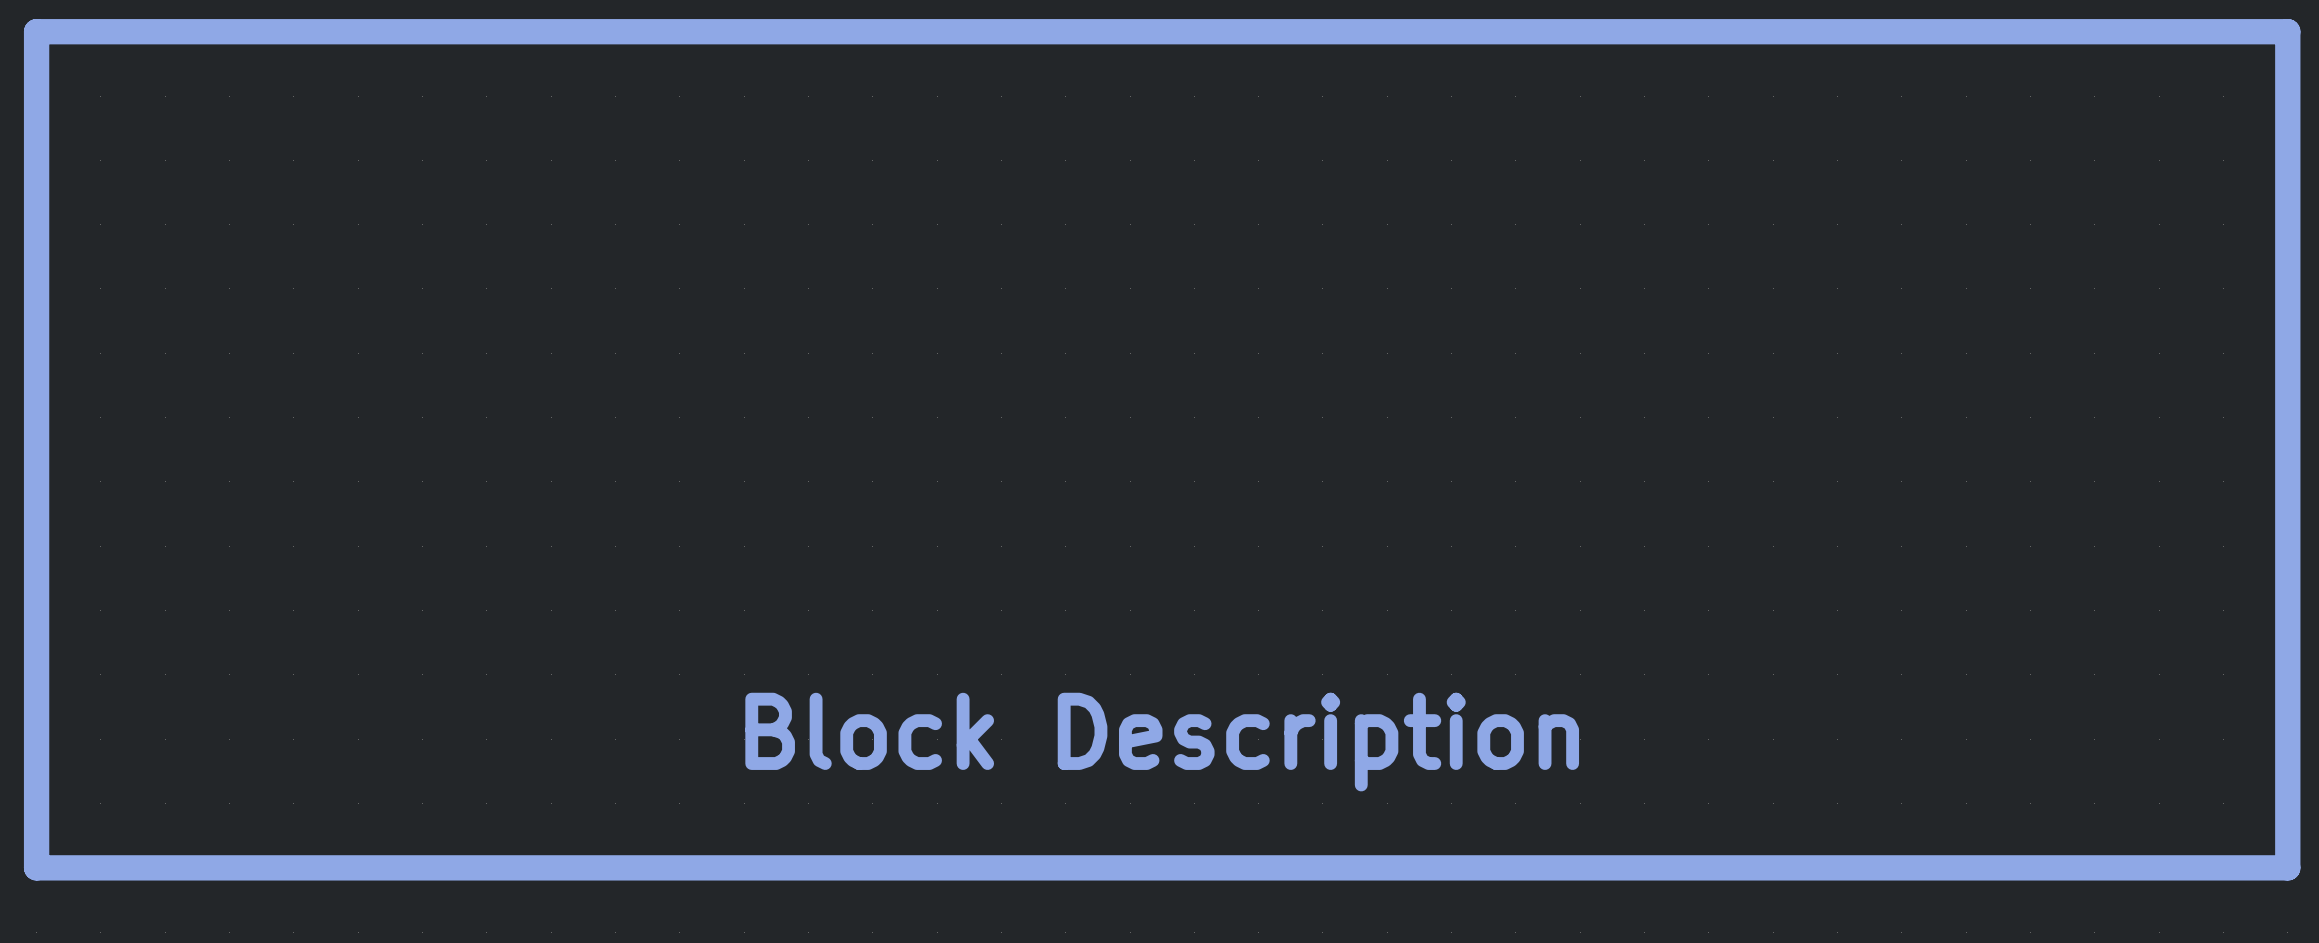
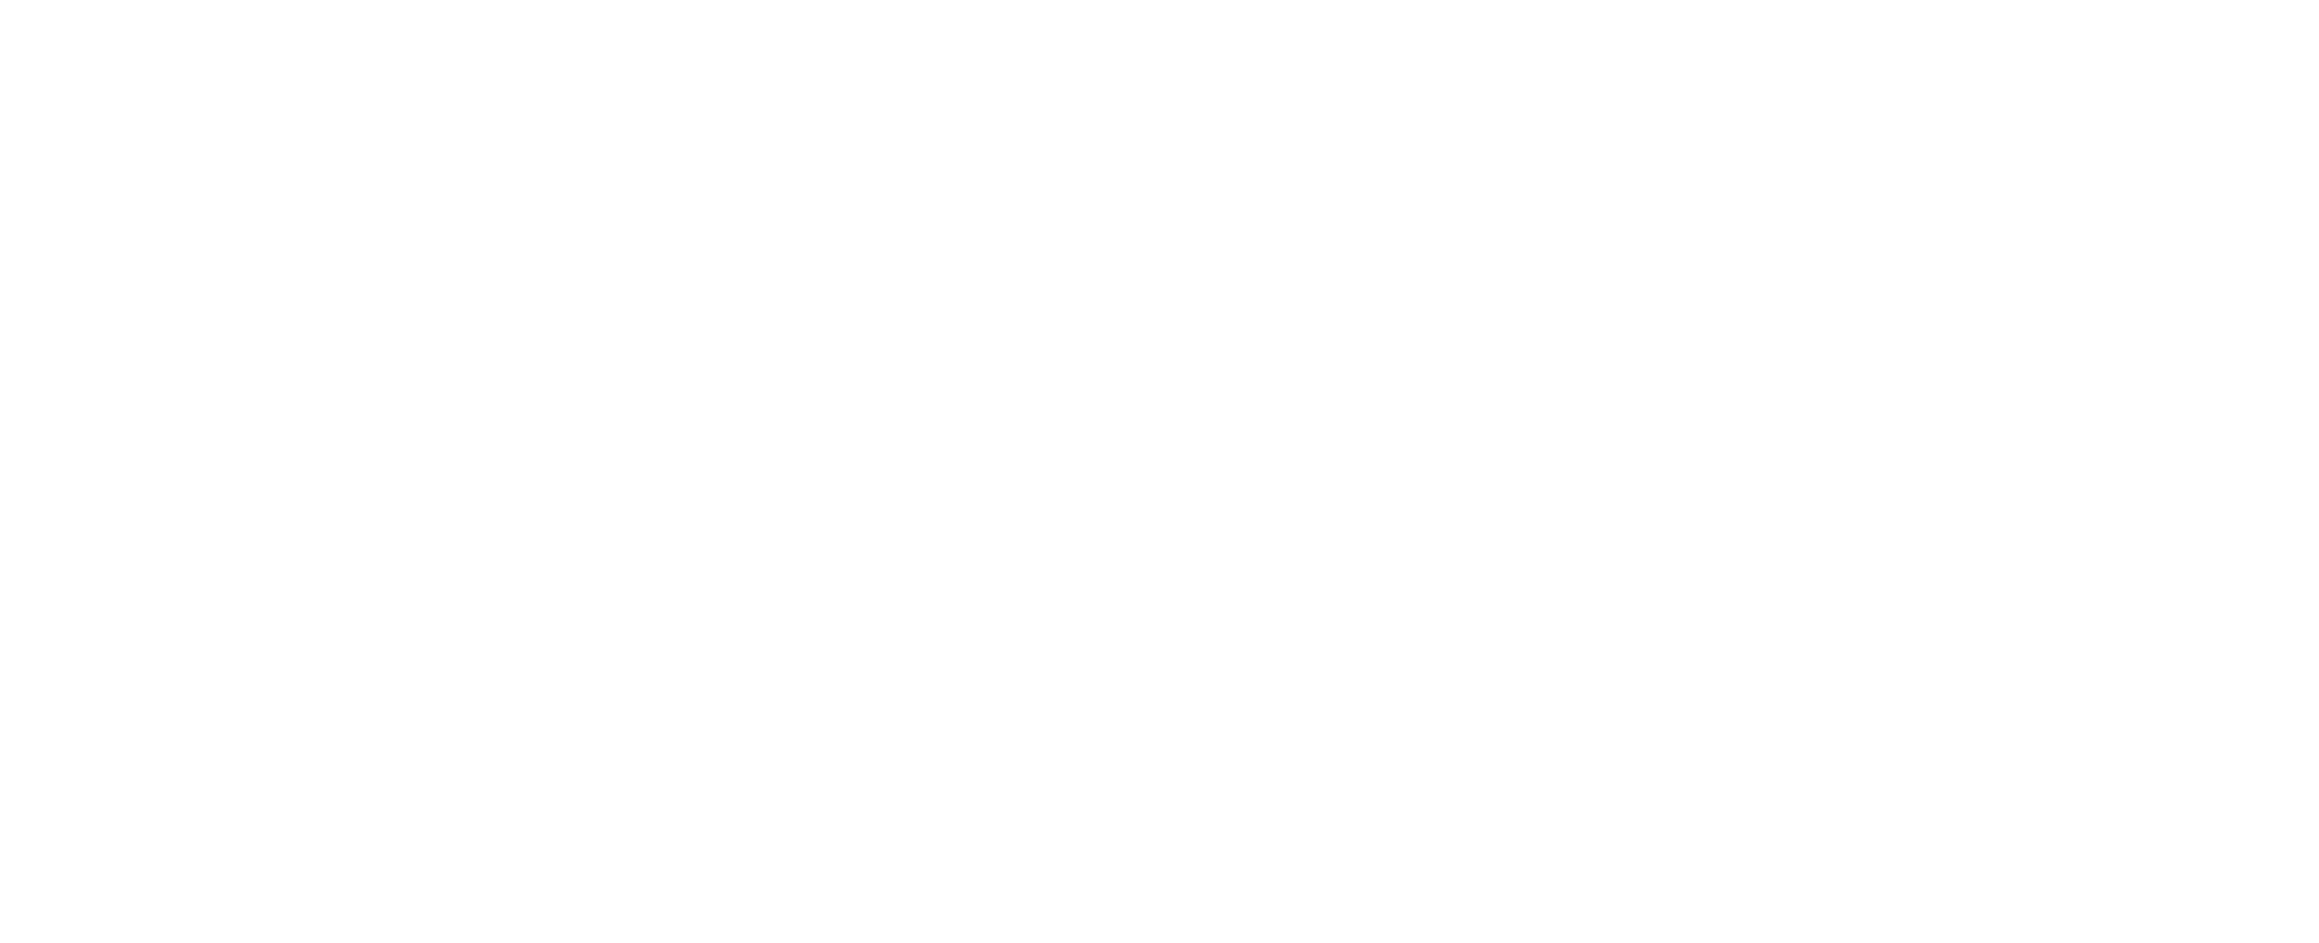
line: (36, 31) (2287, 31) (2287, 867) (36, 867) (36, 31) -> none
text: Block Description (1162, 742) -> none

